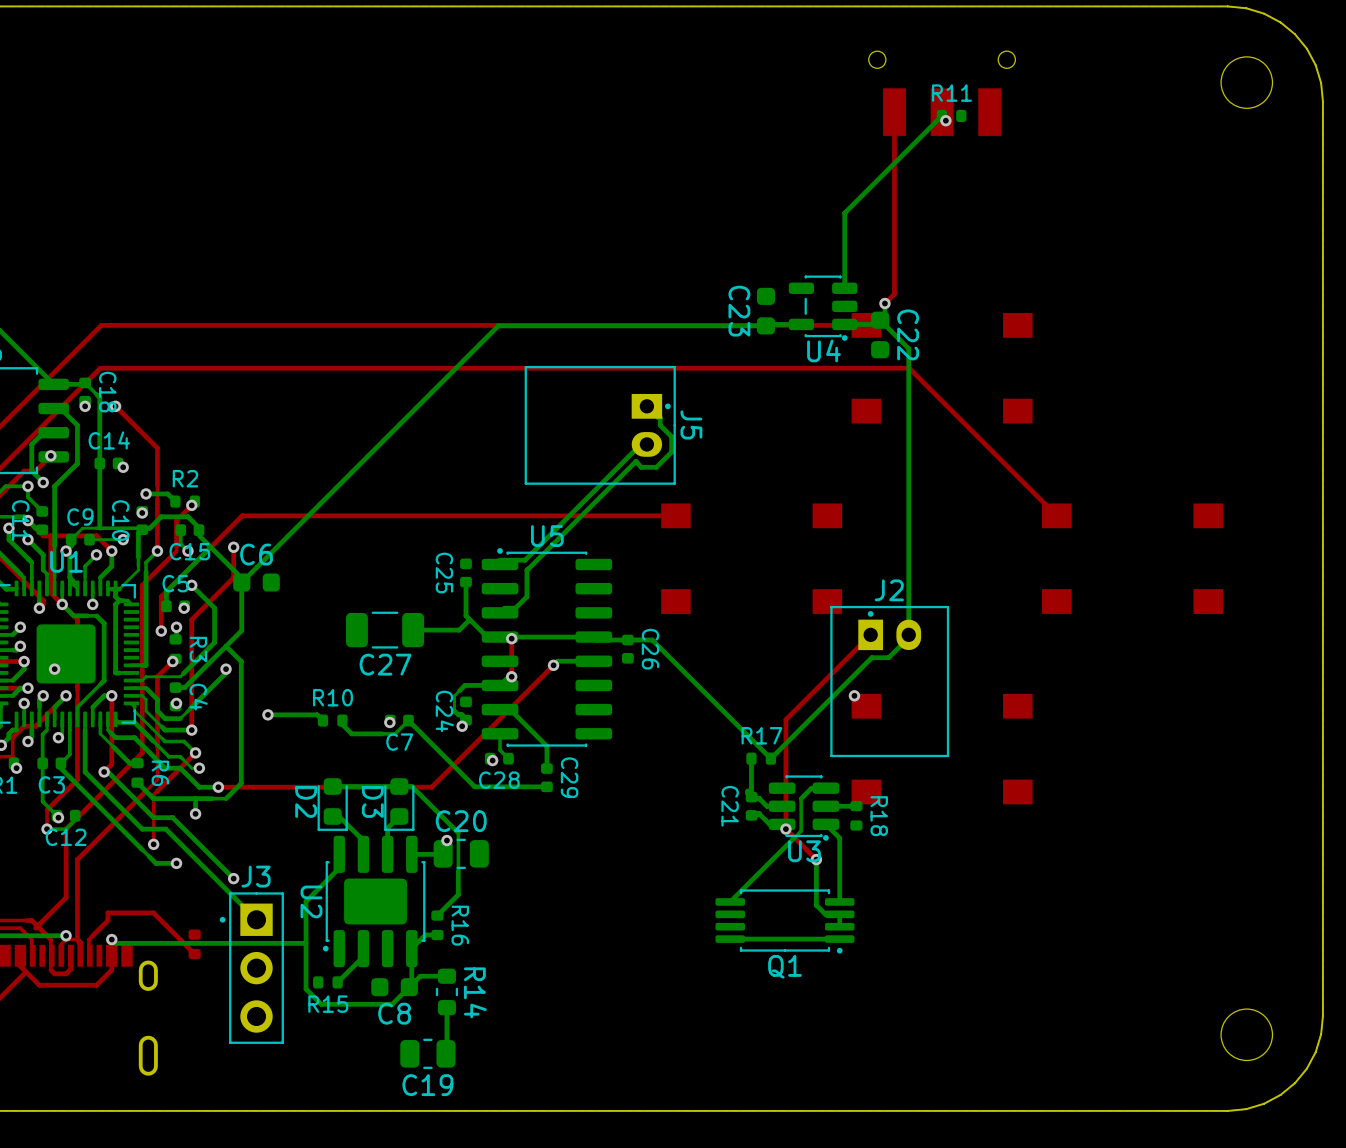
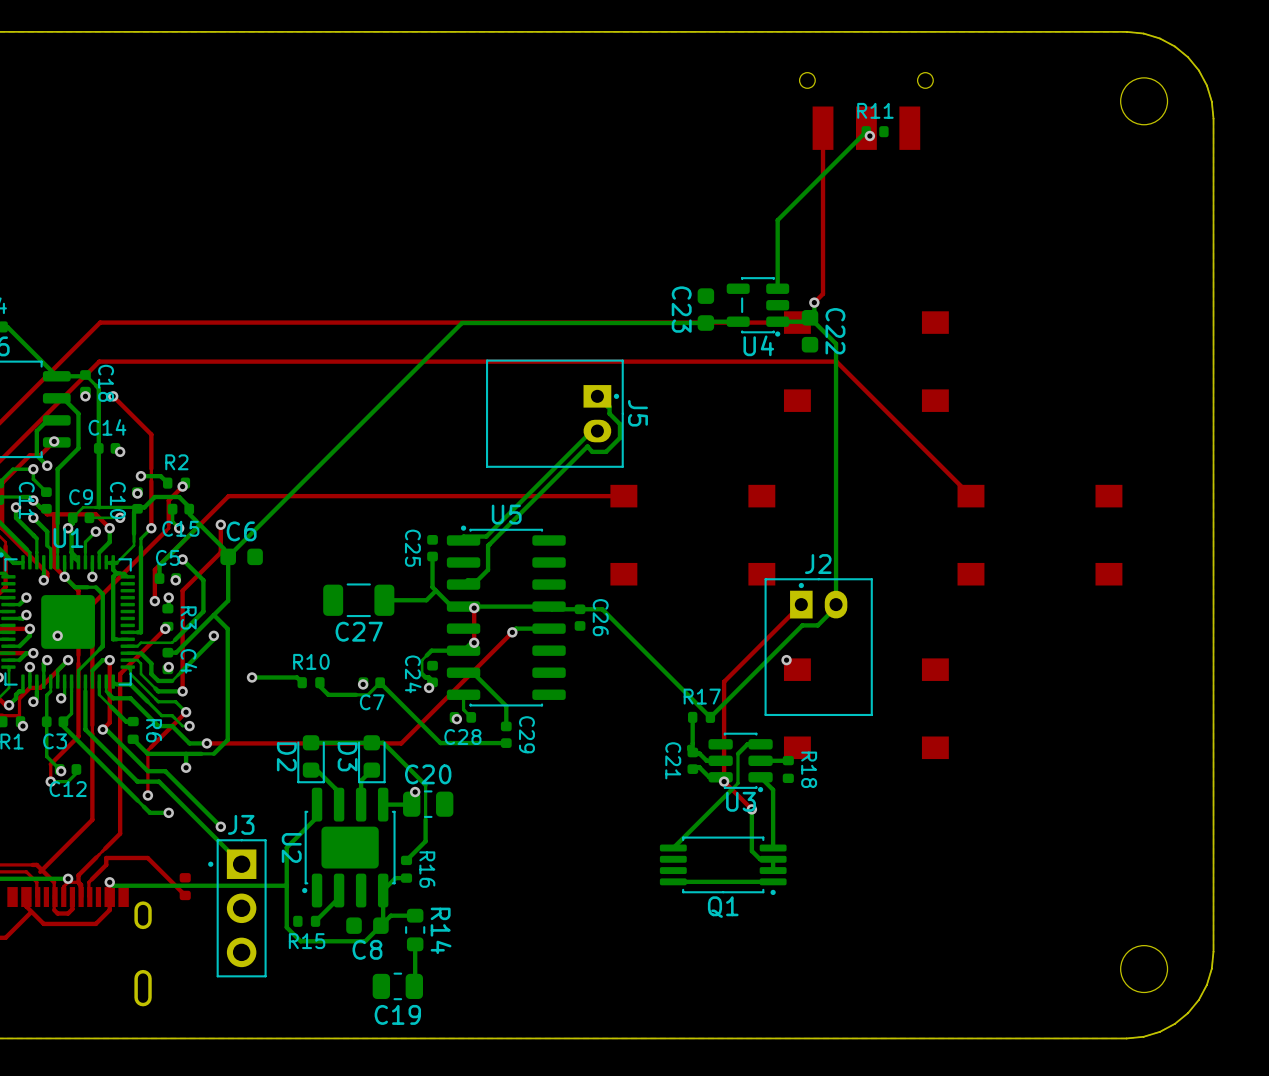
top track: (142, 585) (142, 752) (66, 829) (66, 897) -> (137, 559) (92, 604) (92, 819) (68, 844)
top track: (157, 676) (157, 779) (77, 859) (77, 931) -> (151, 642) (120, 674) (120, 833) (78, 875)

